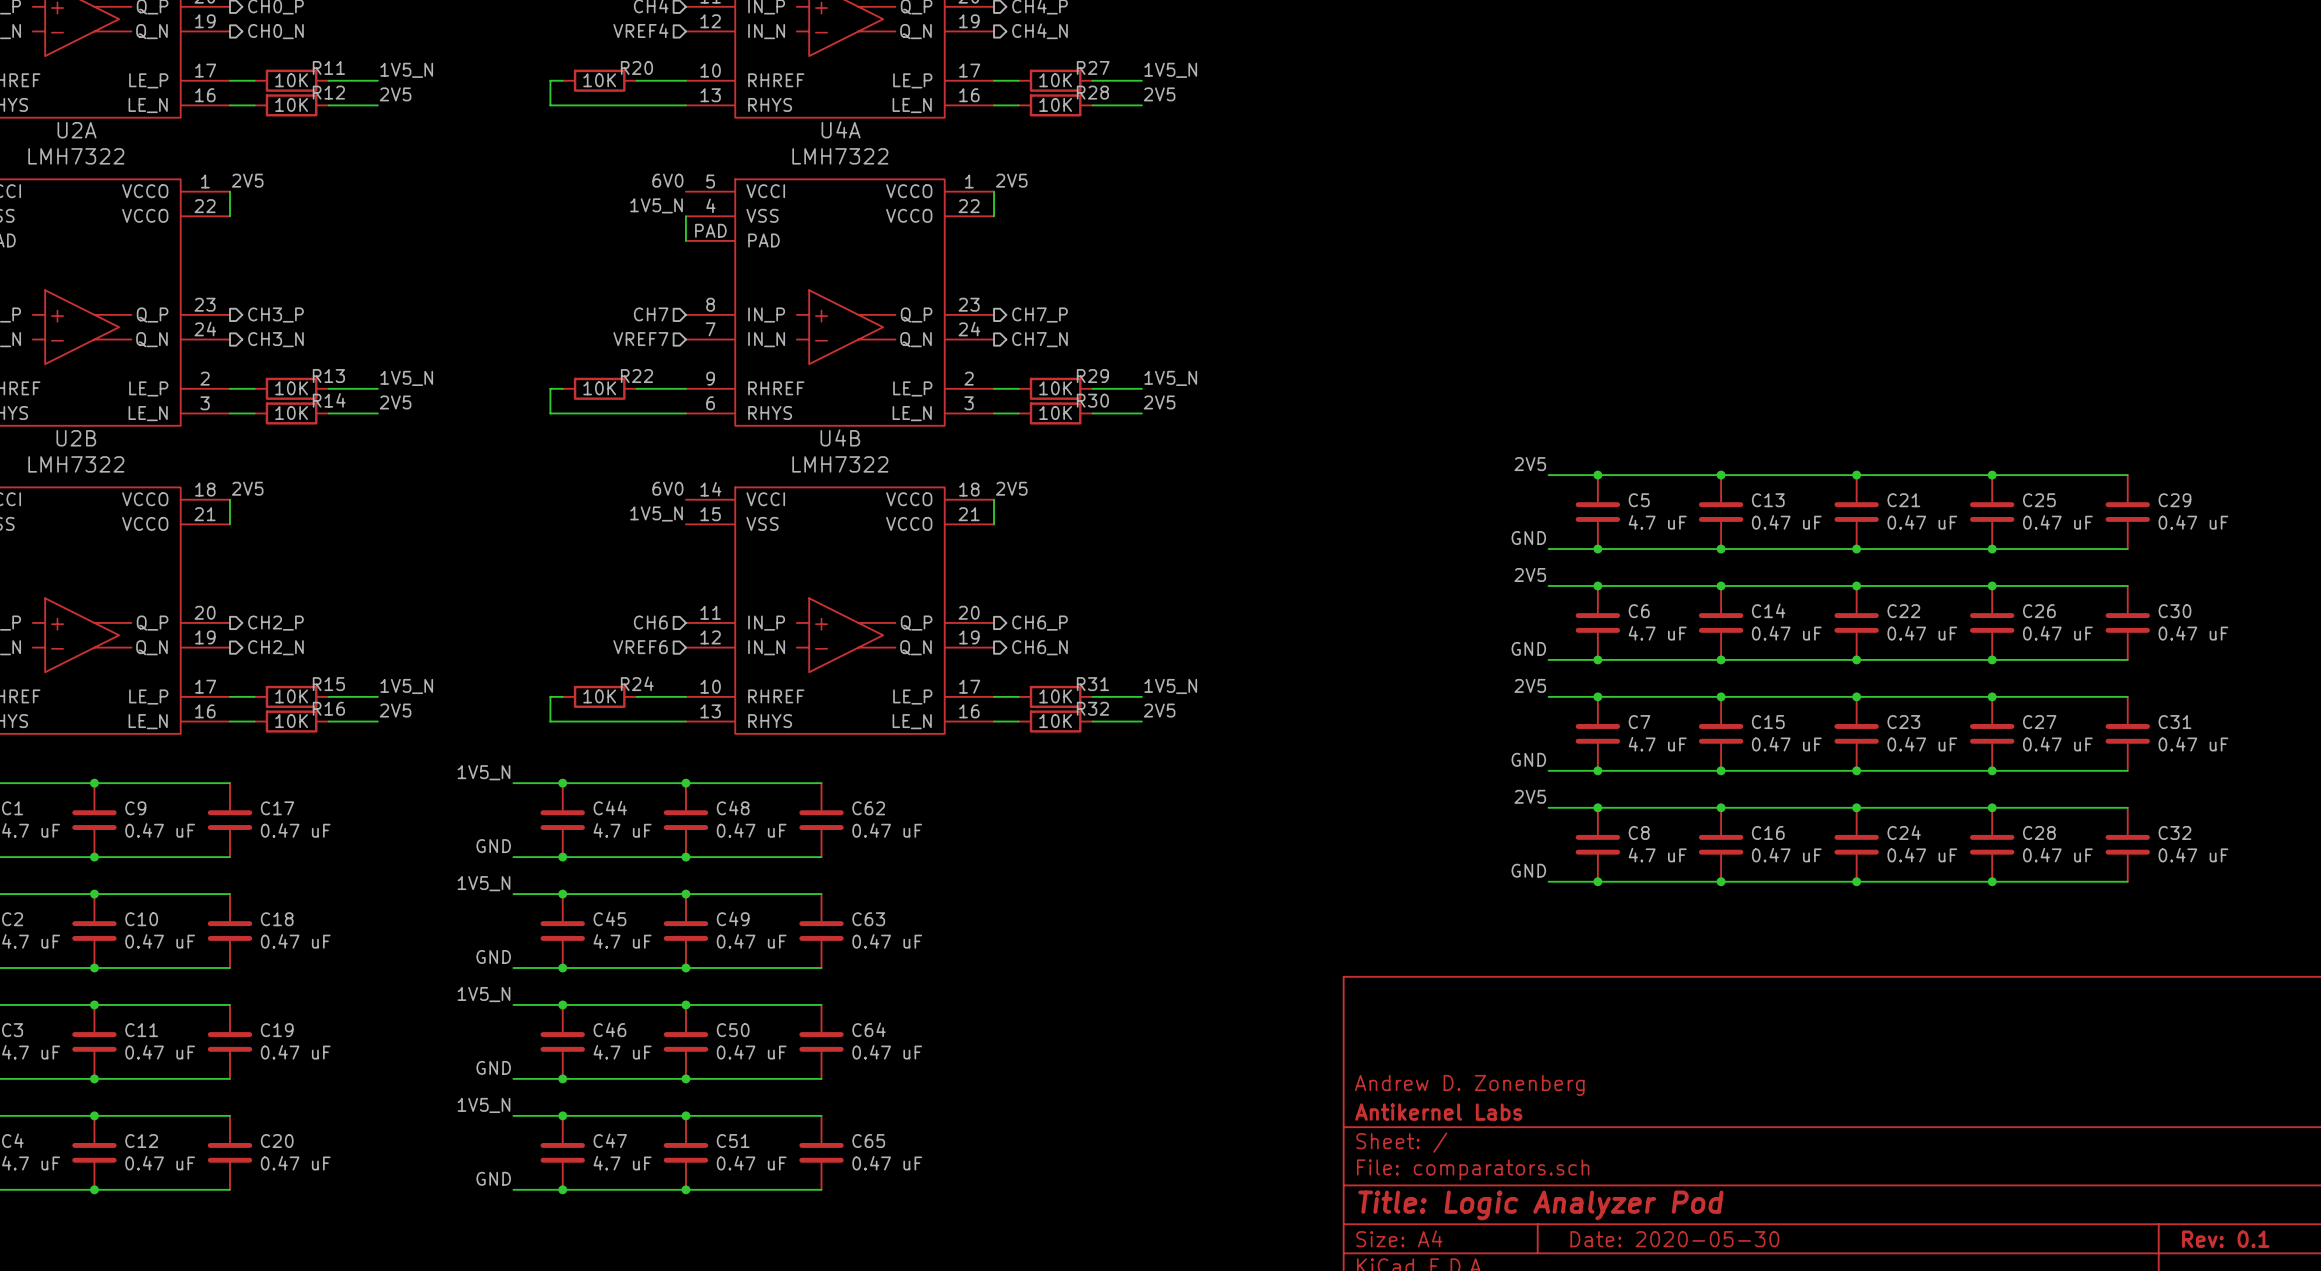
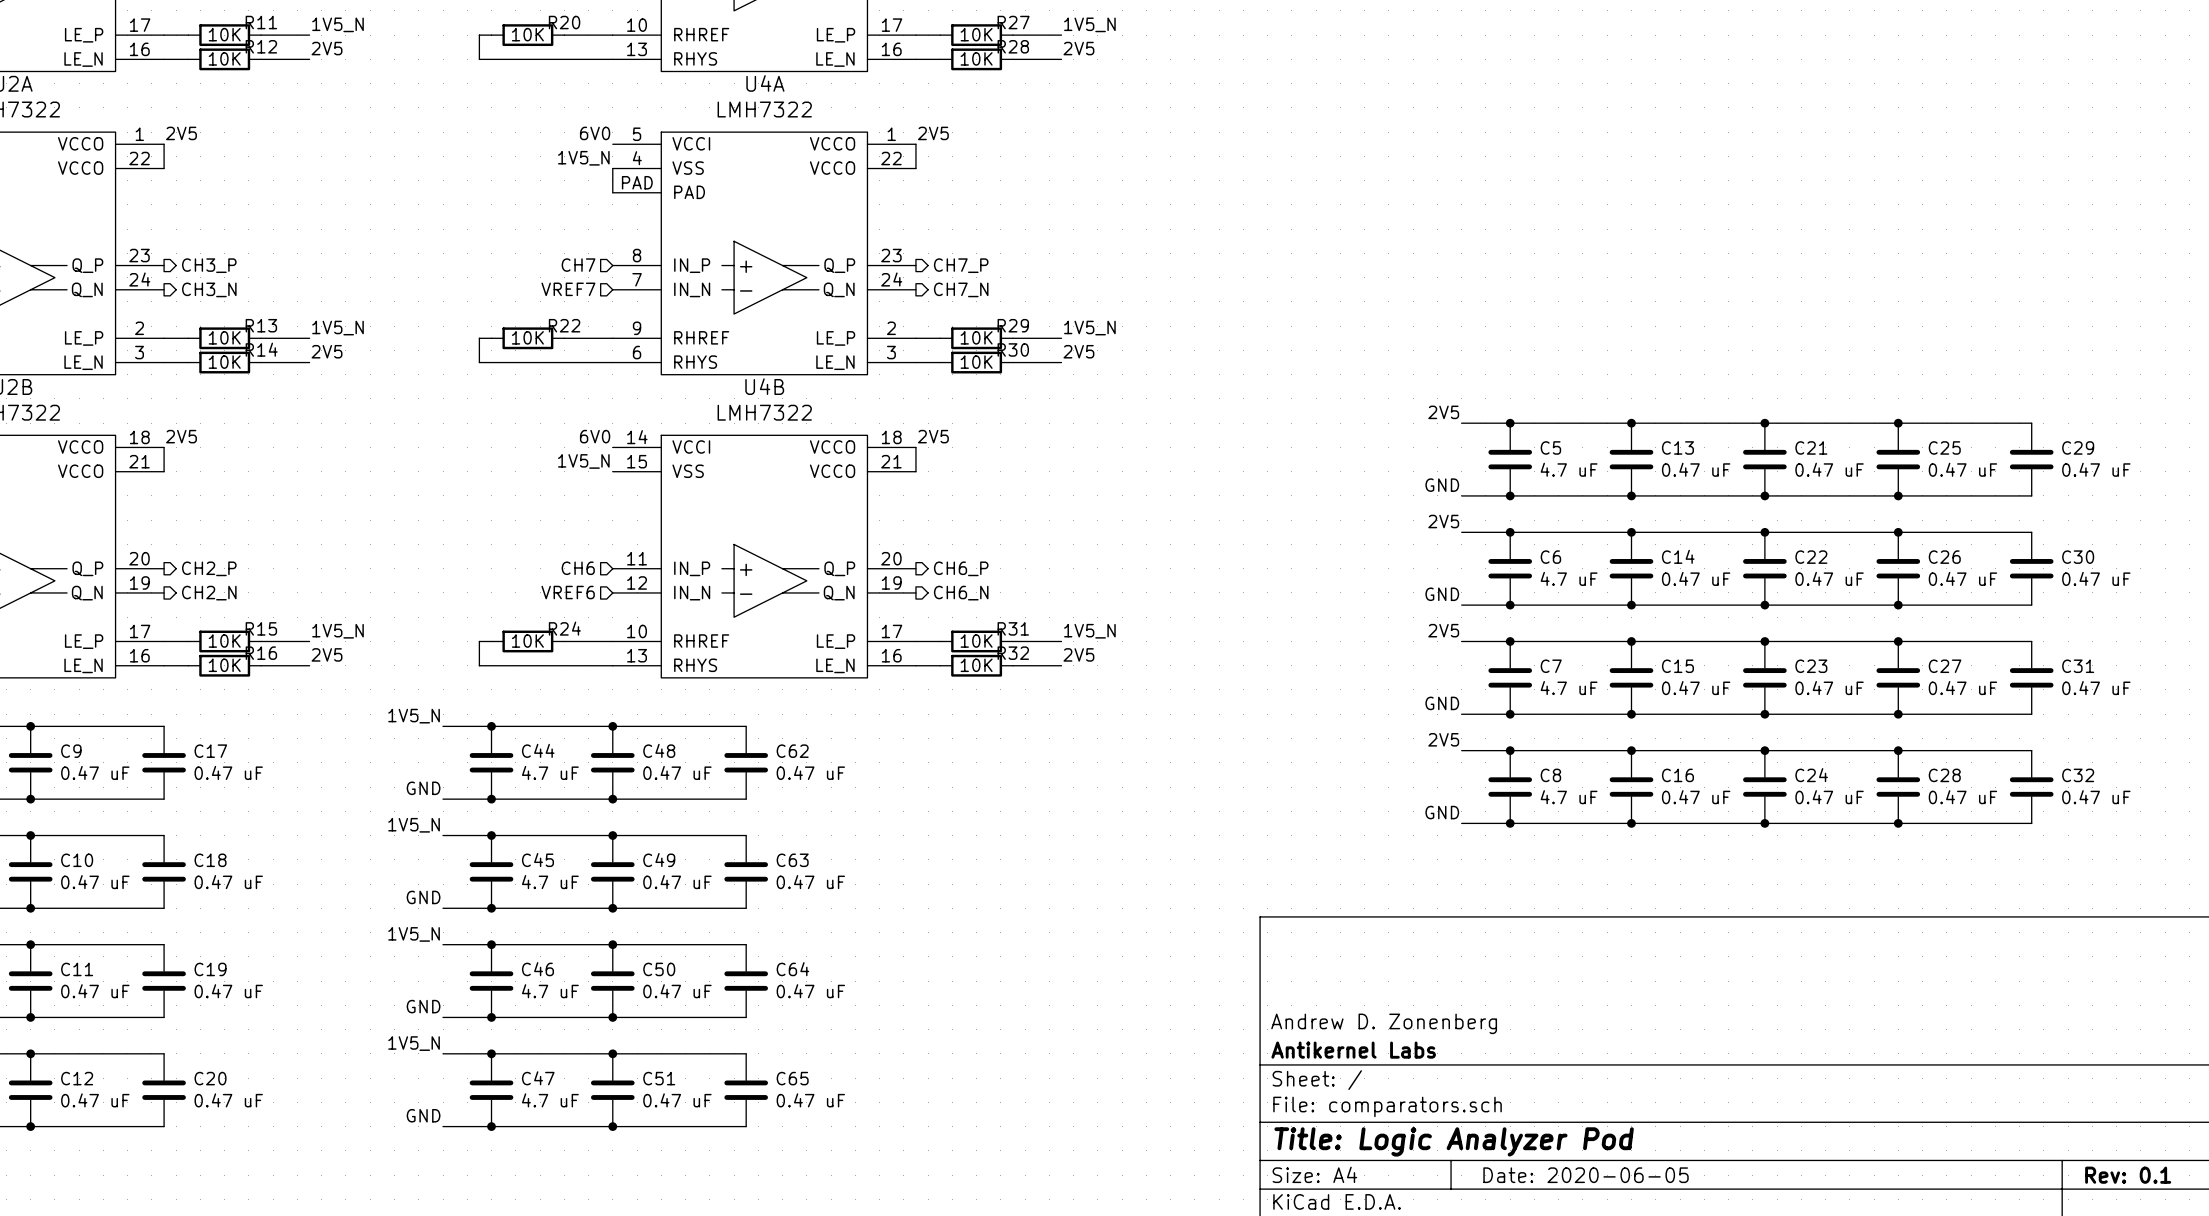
title block: Date: 2020-05-30 (1674, 1239) -> Date: 2020-06-05 (1586, 1175)

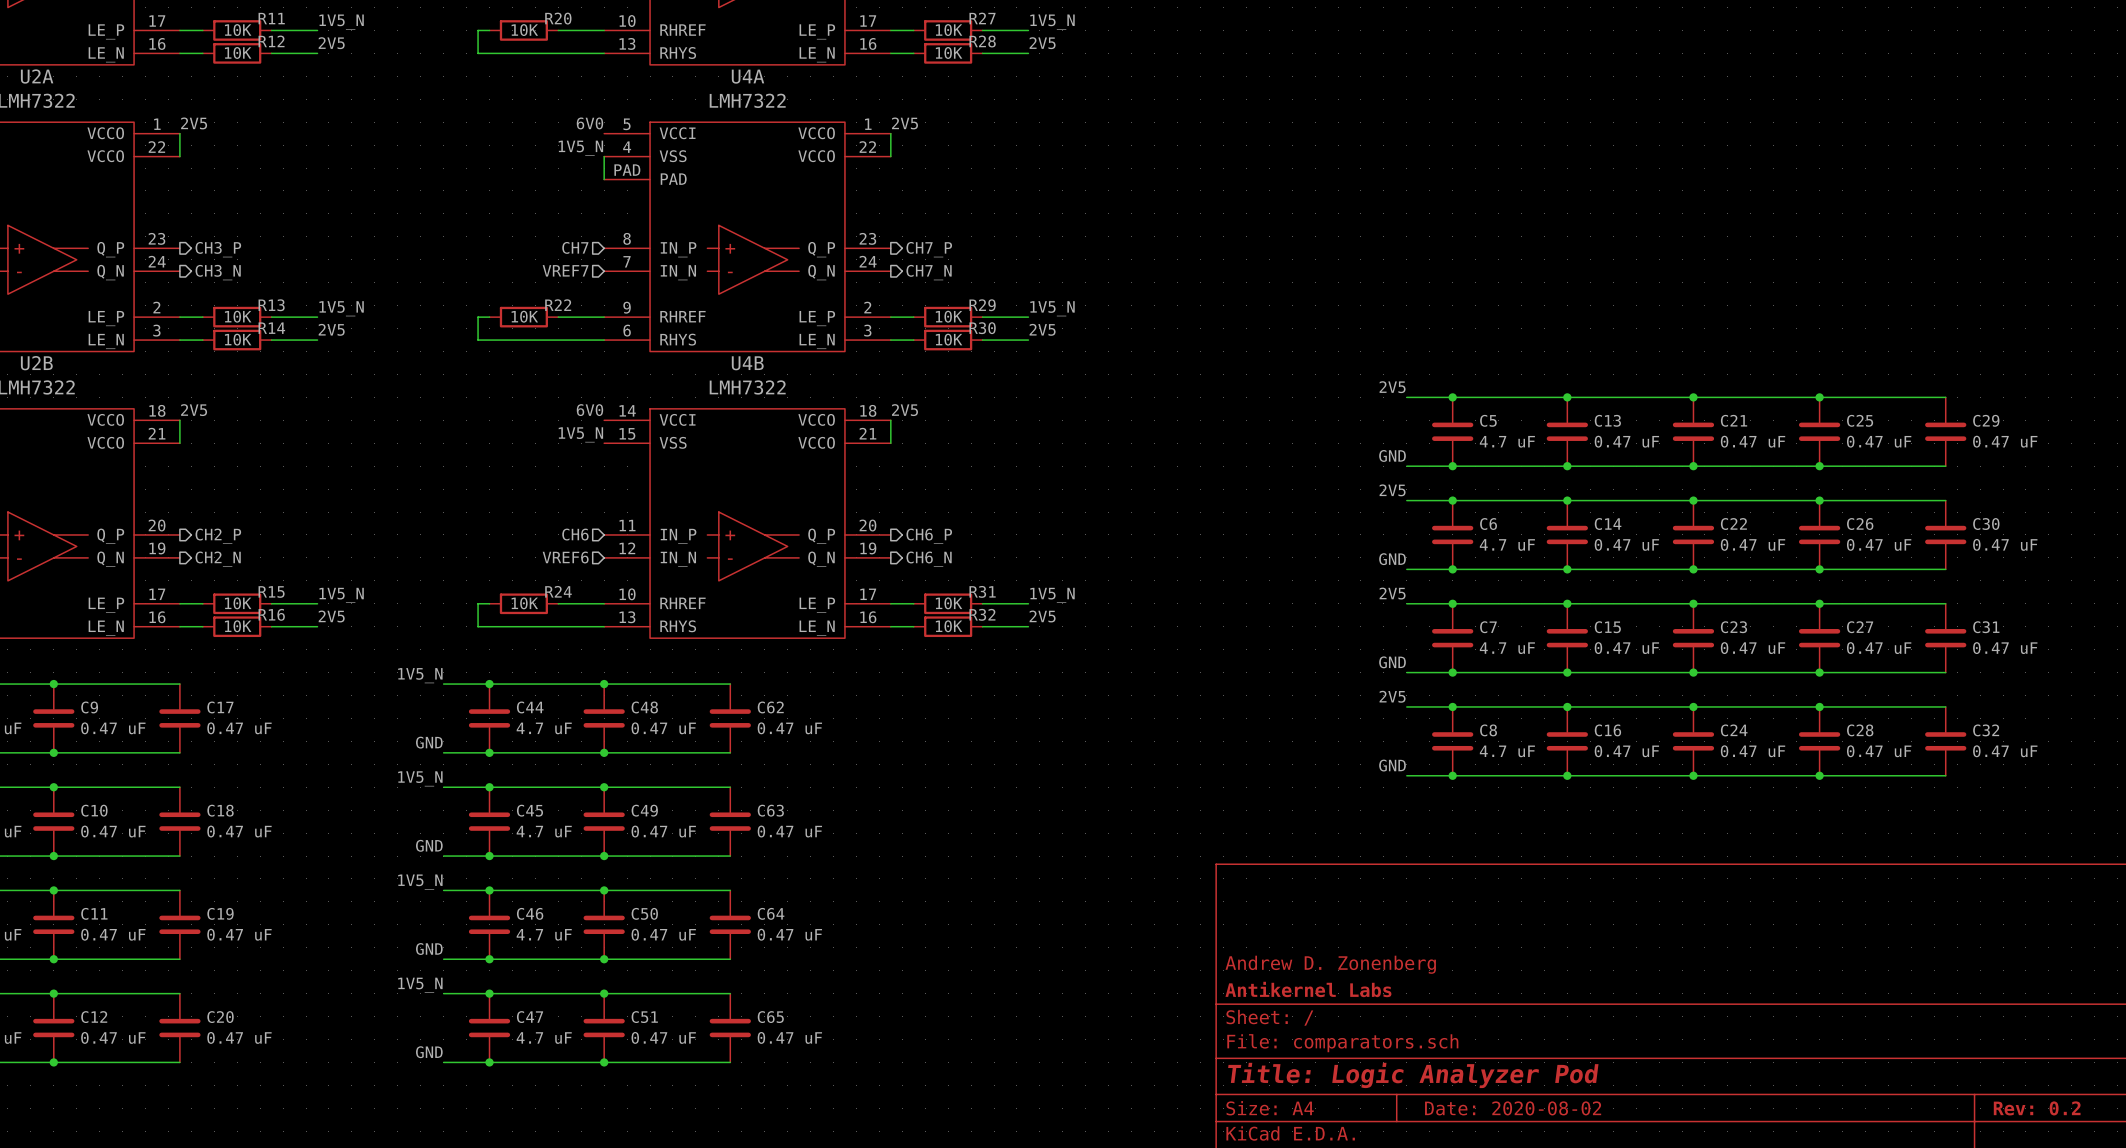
title block: Date: 2020-06-05 (1586, 1175) -> Date: 2020-08-02 (1513, 1108)
title block: Rev: 0.1 (2128, 1175) -> Rev: 0.2 (2037, 1108)

